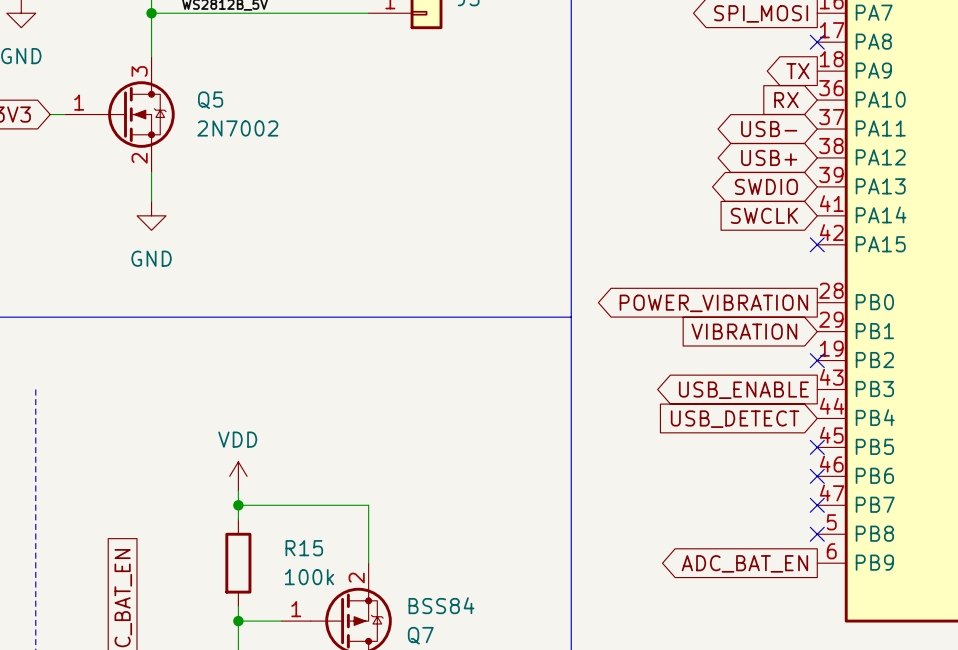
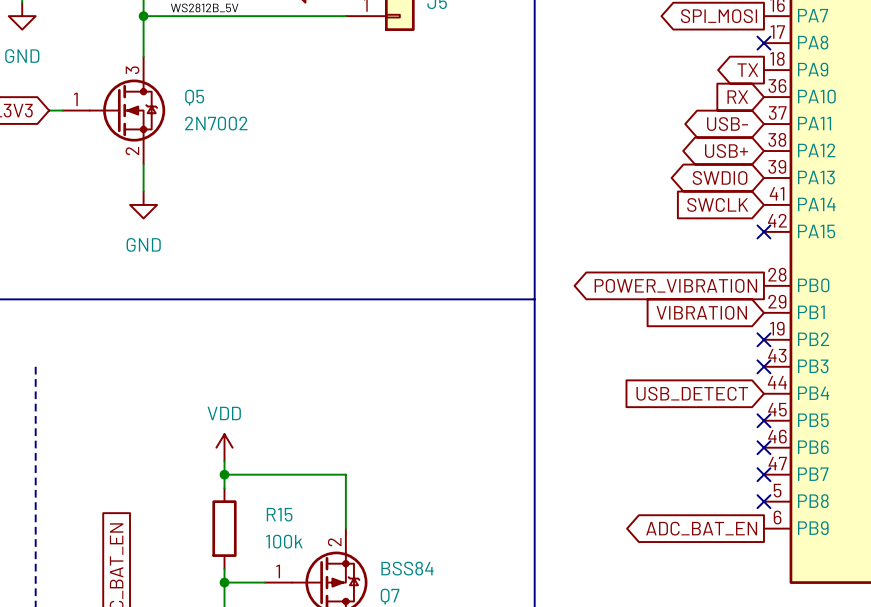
no-connect mark: none -> (763, 366)
global label: USB_ENABLE (743, 390) -> none

